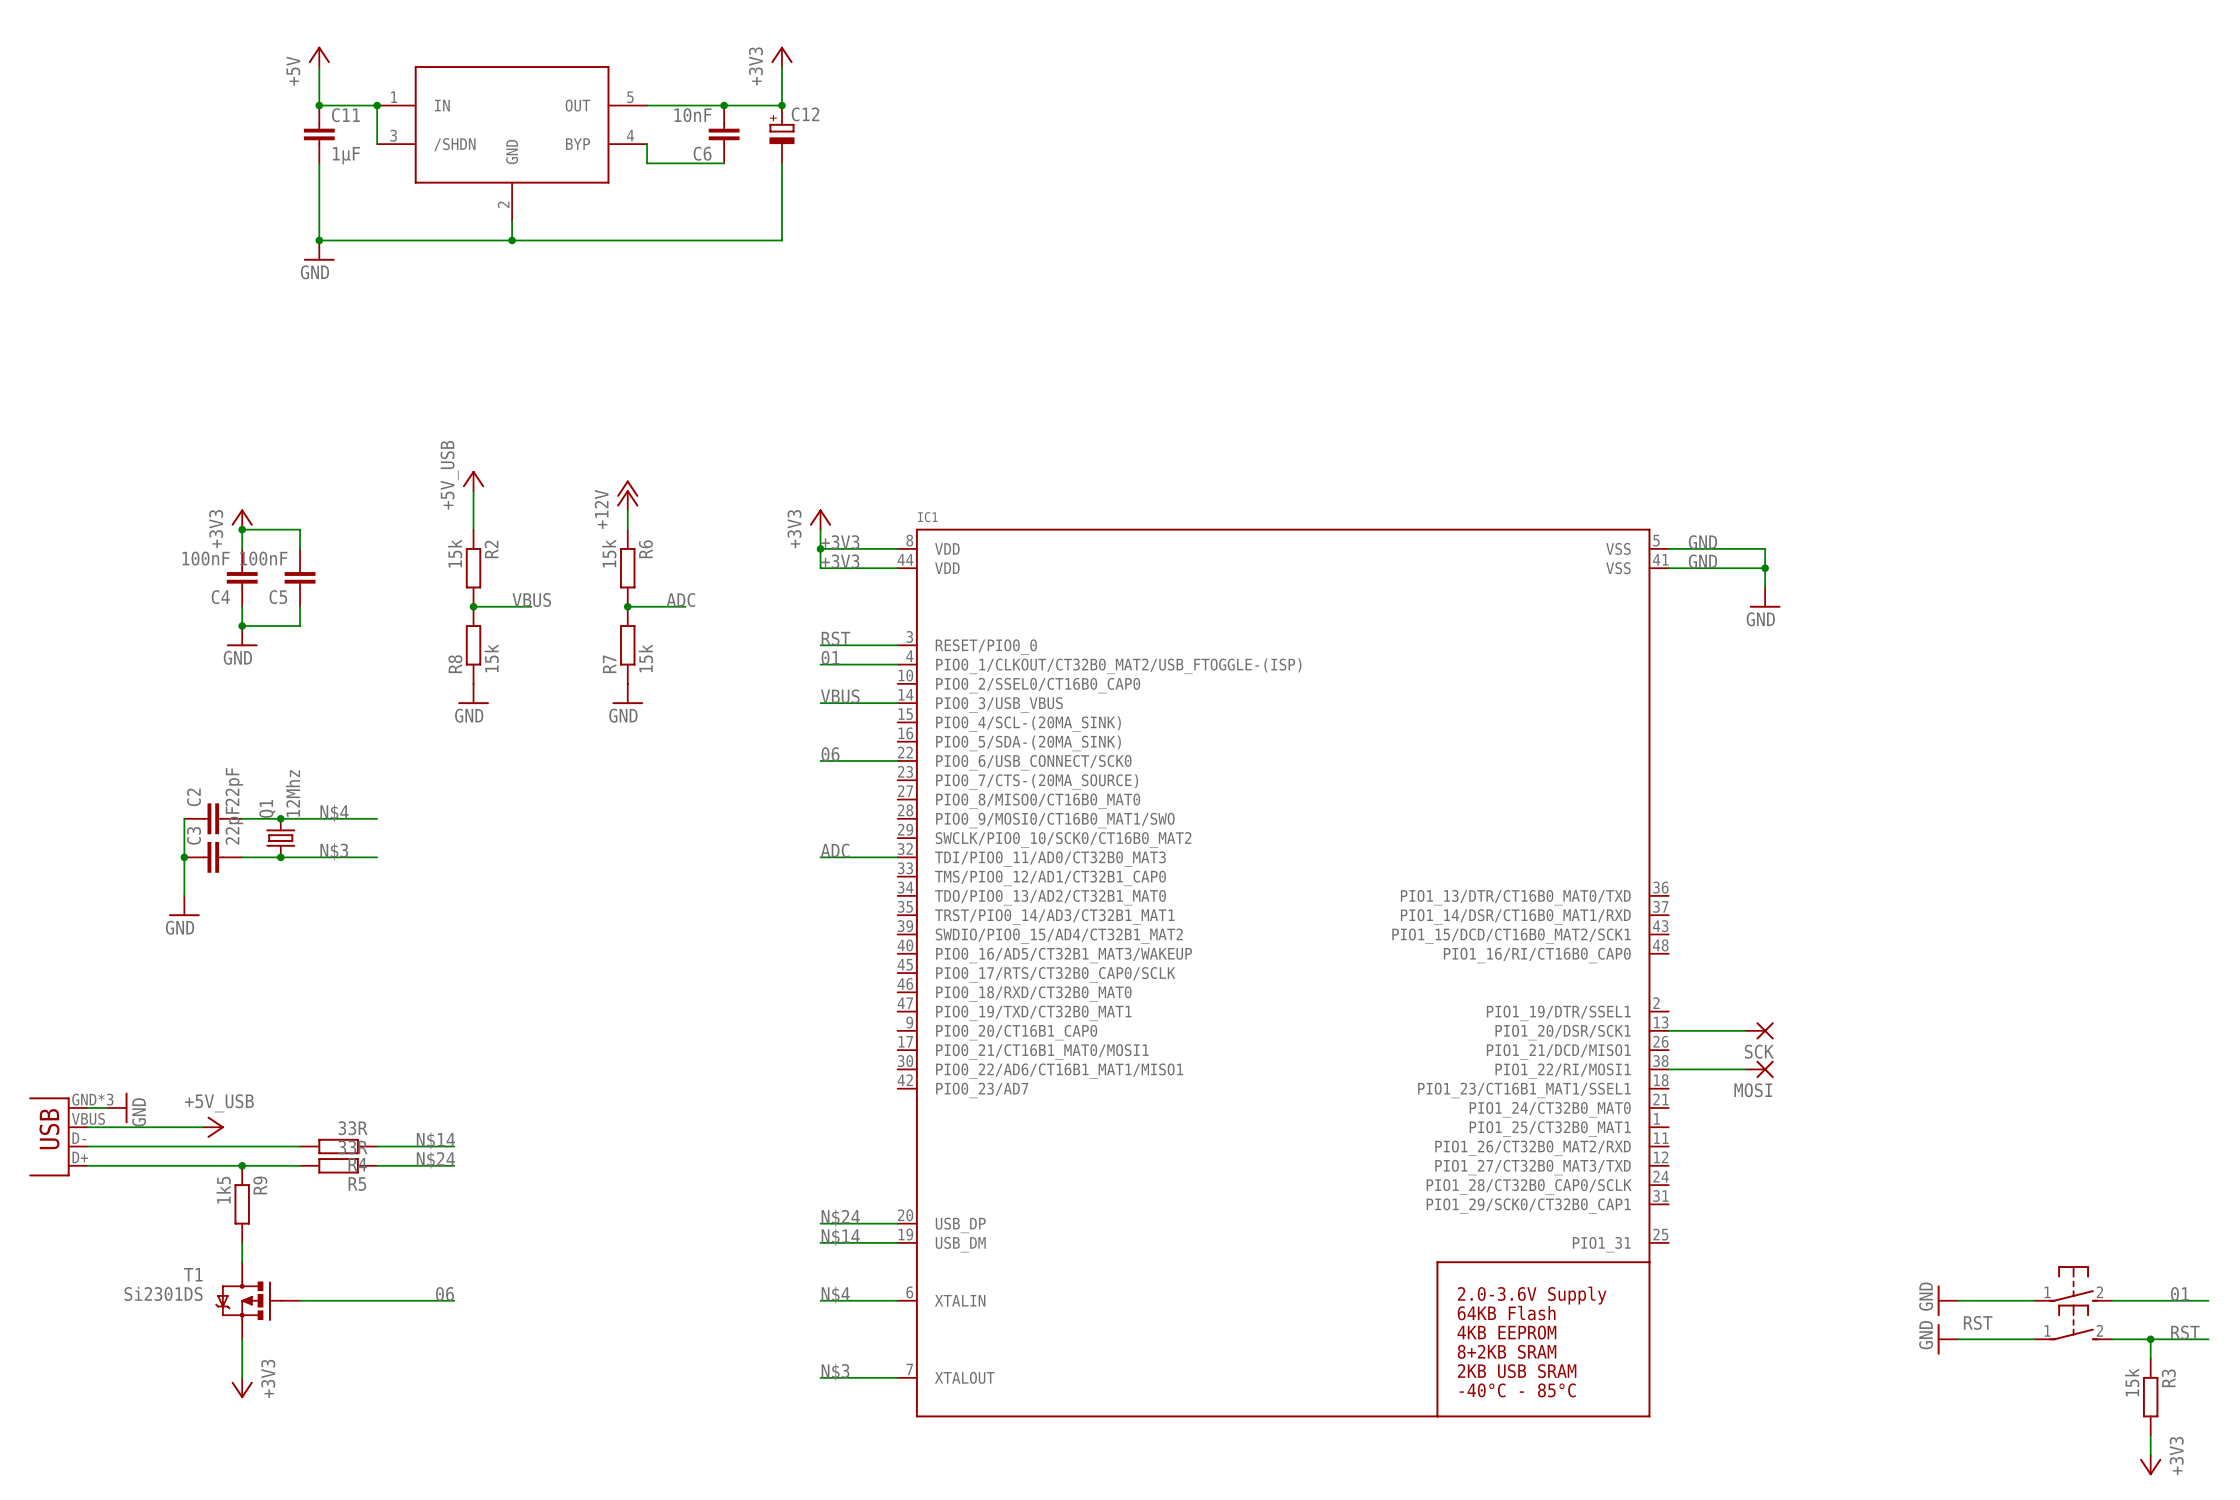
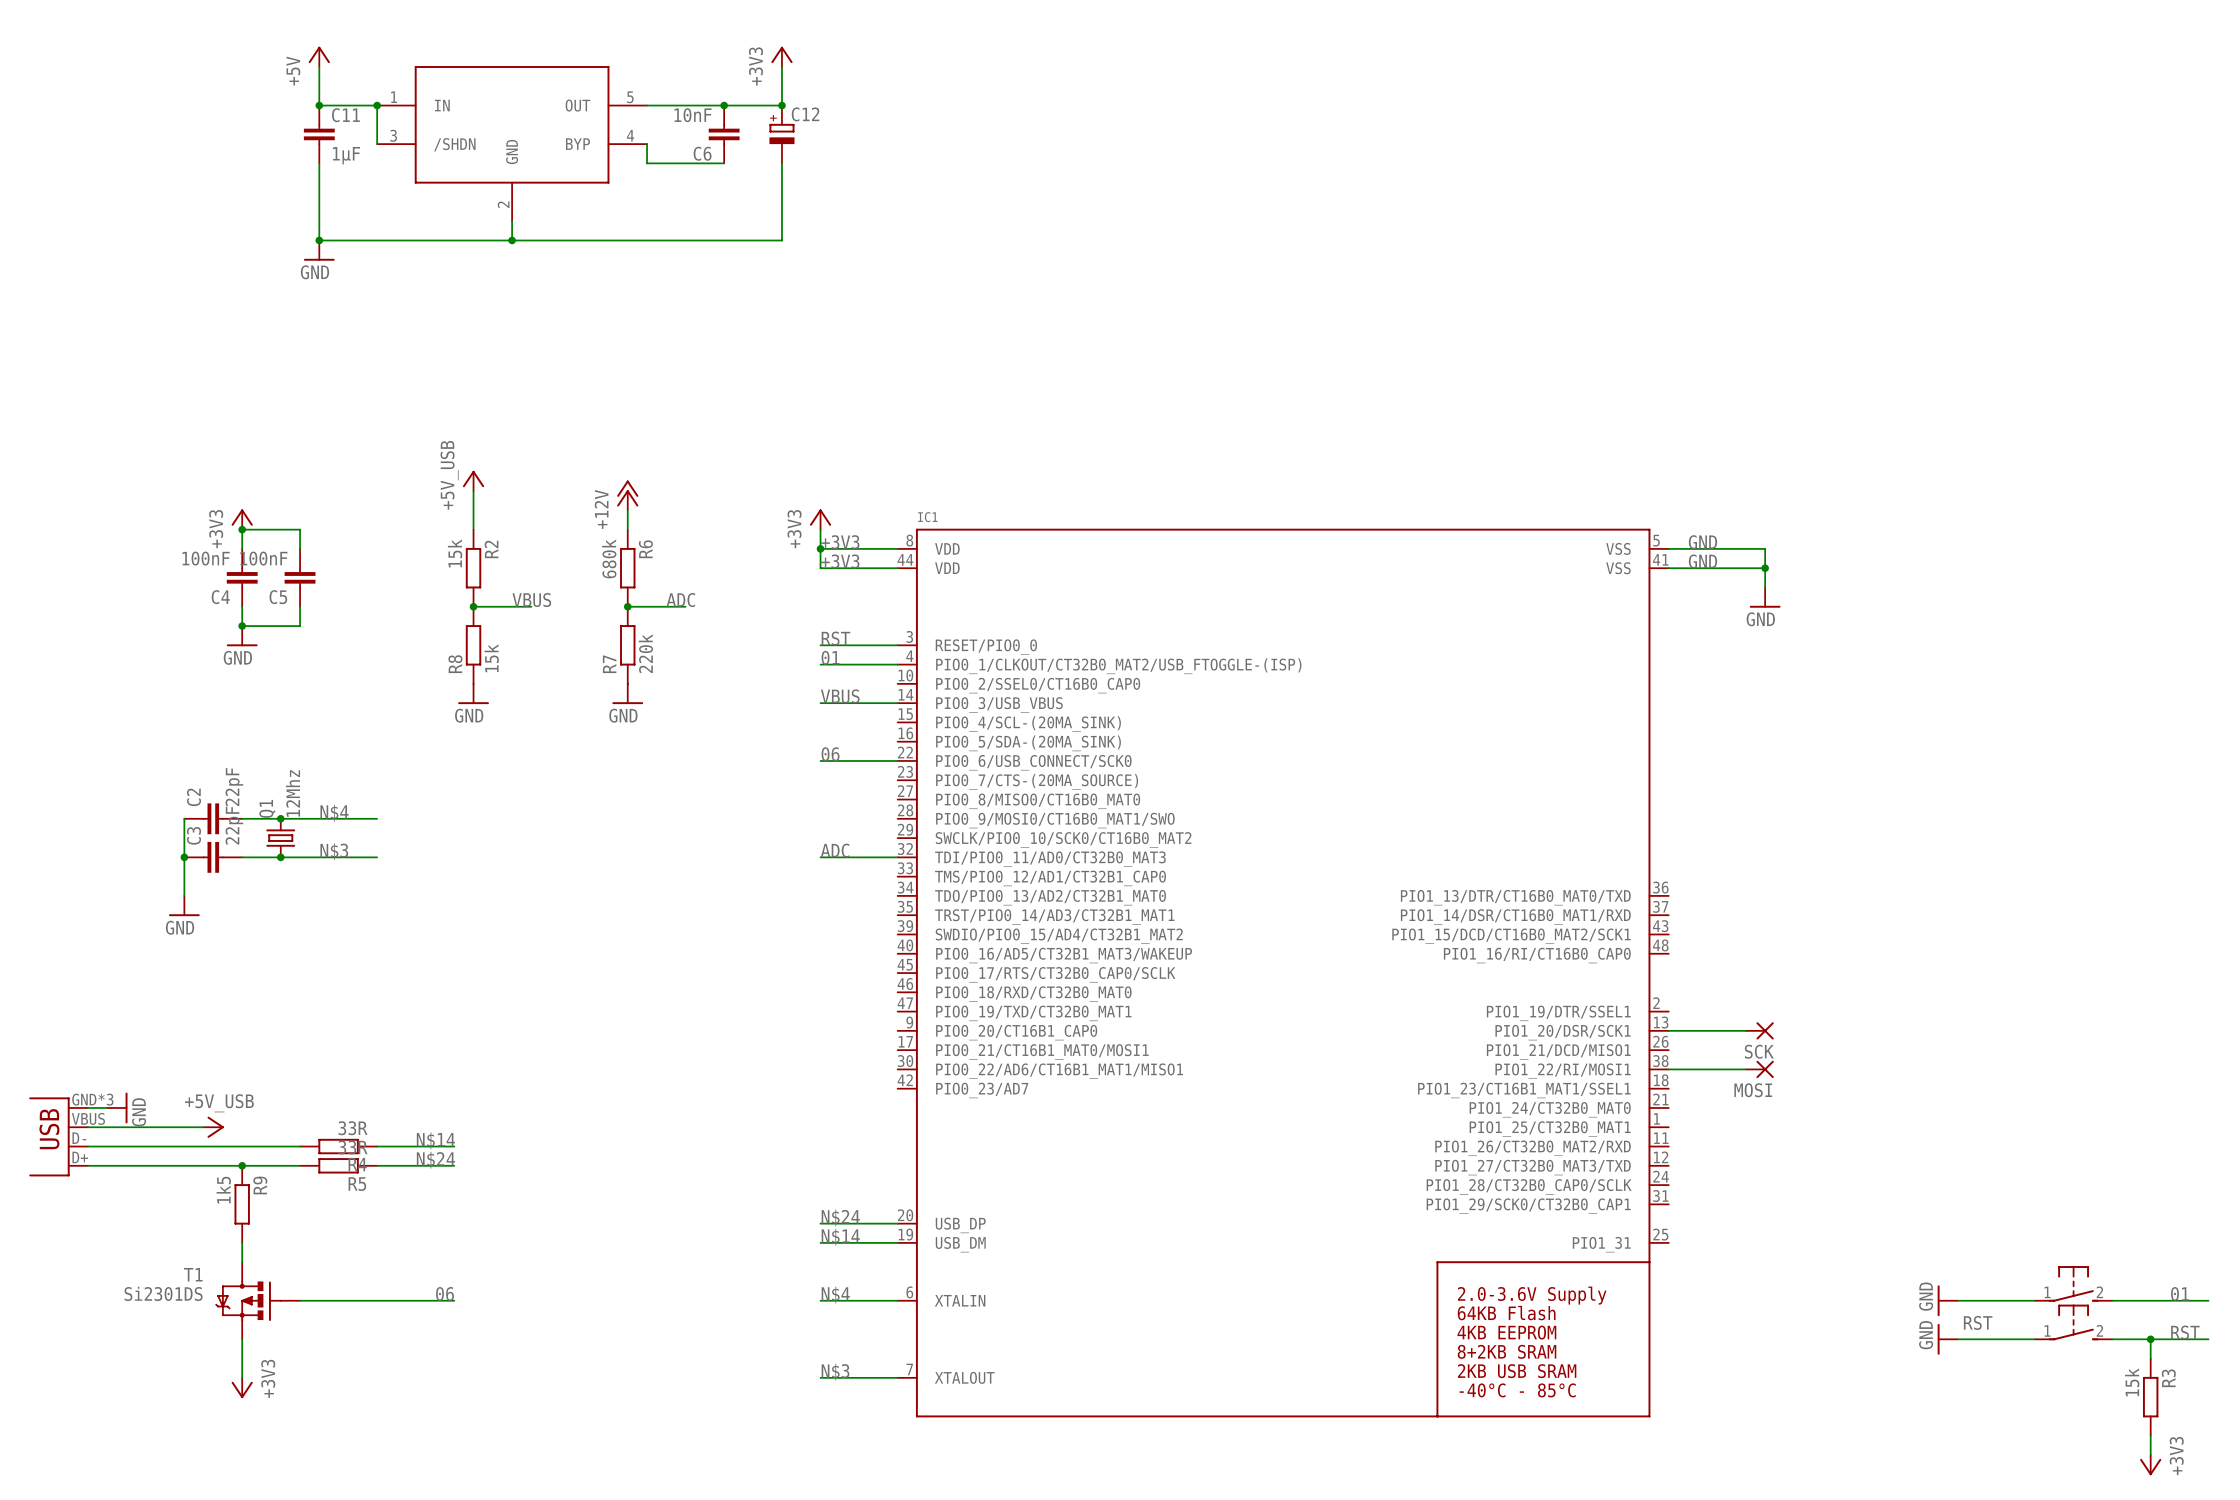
R6 value: 15k (609, 553) -> 680k (609, 558)
R7 value: 15k (645, 658) -> 220k (645, 653)

